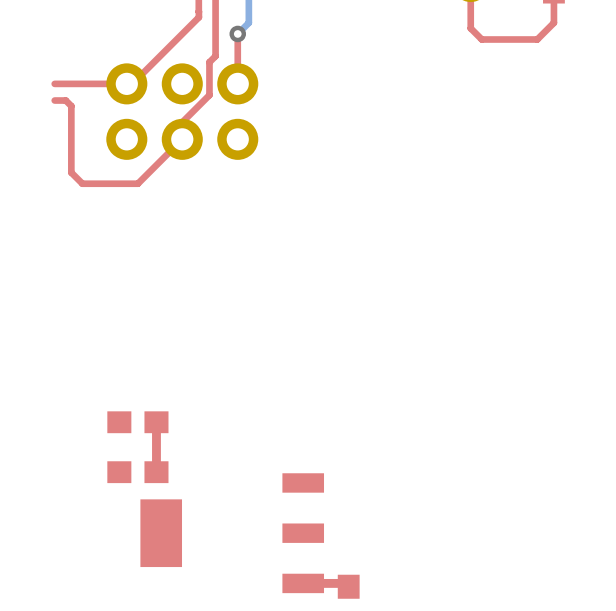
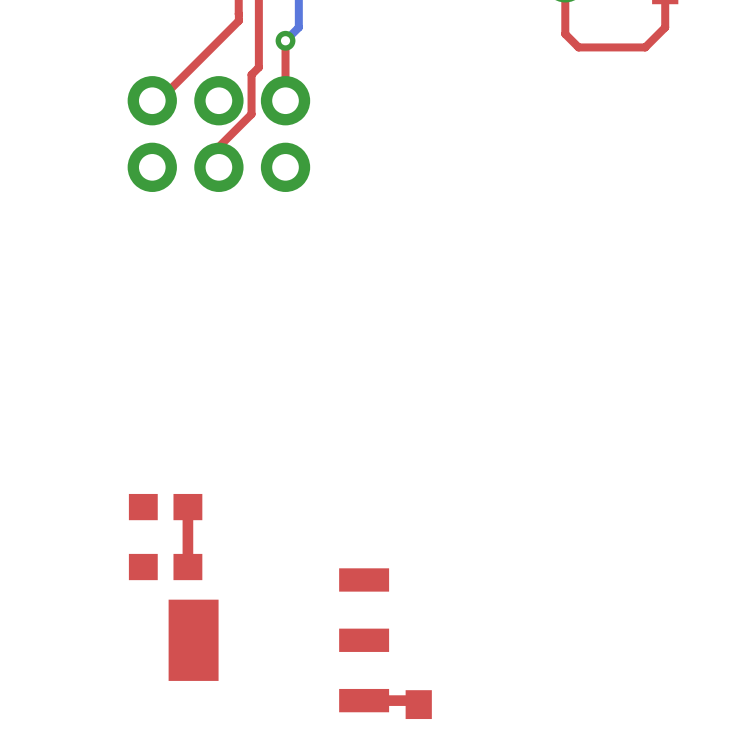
top track: (126, 83) (54, 83) -> none
top track: (54, 100) (65, 100) (71, 106) (71, 172) (82, 183) (137, 183) (182, 139) -> none

